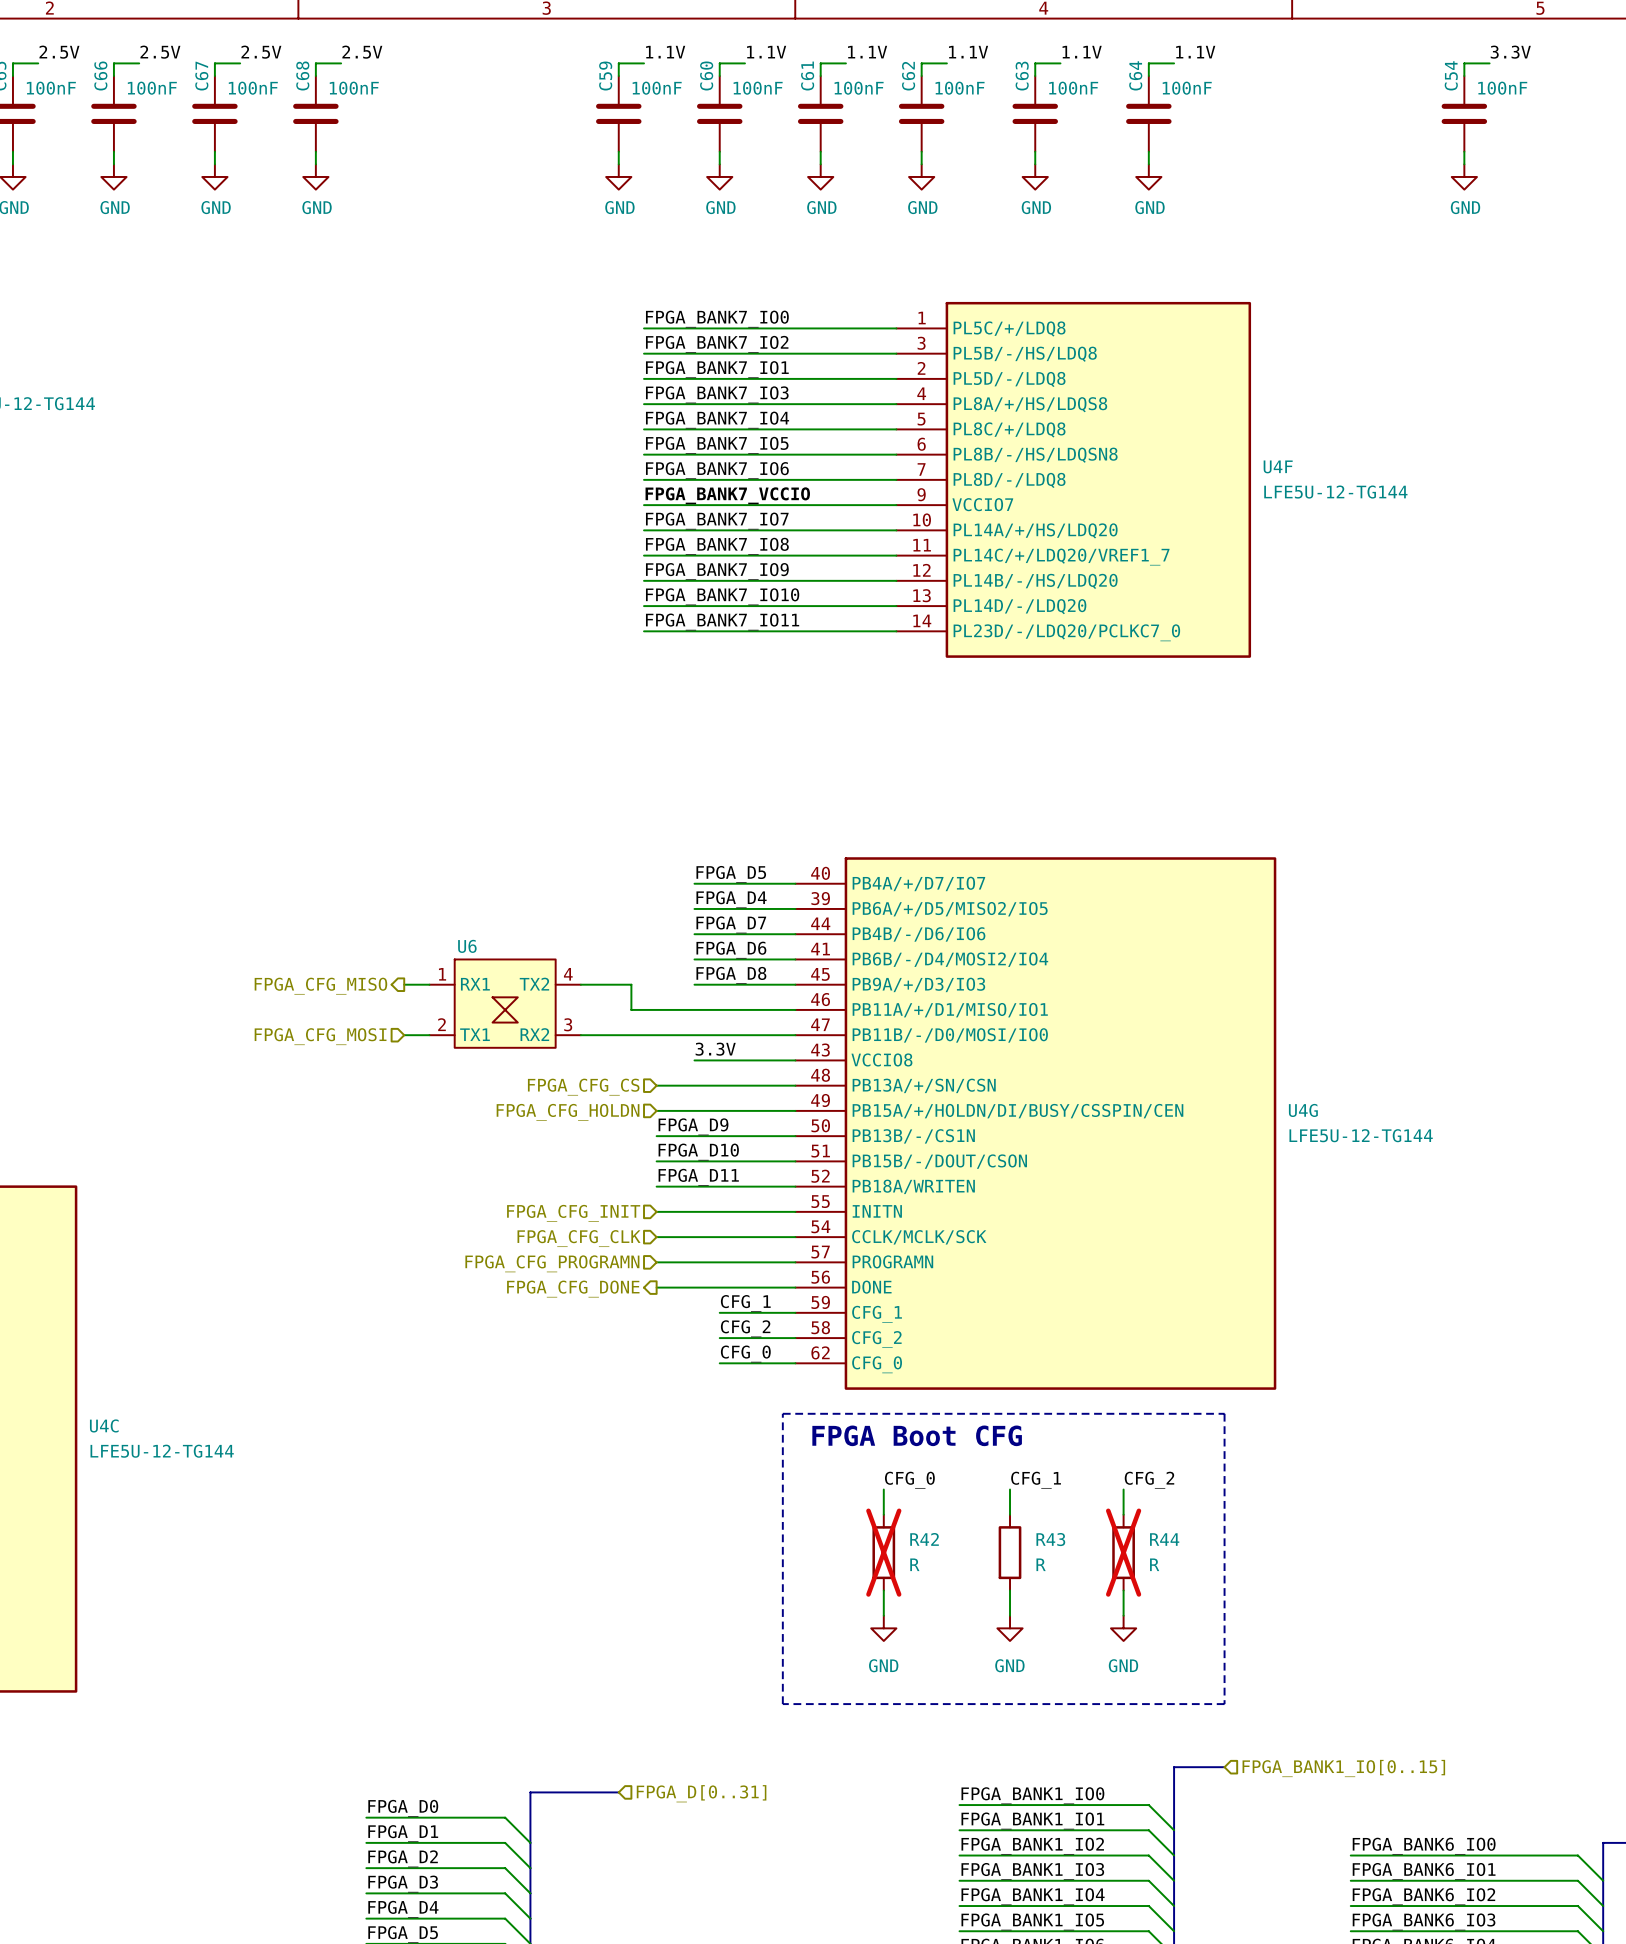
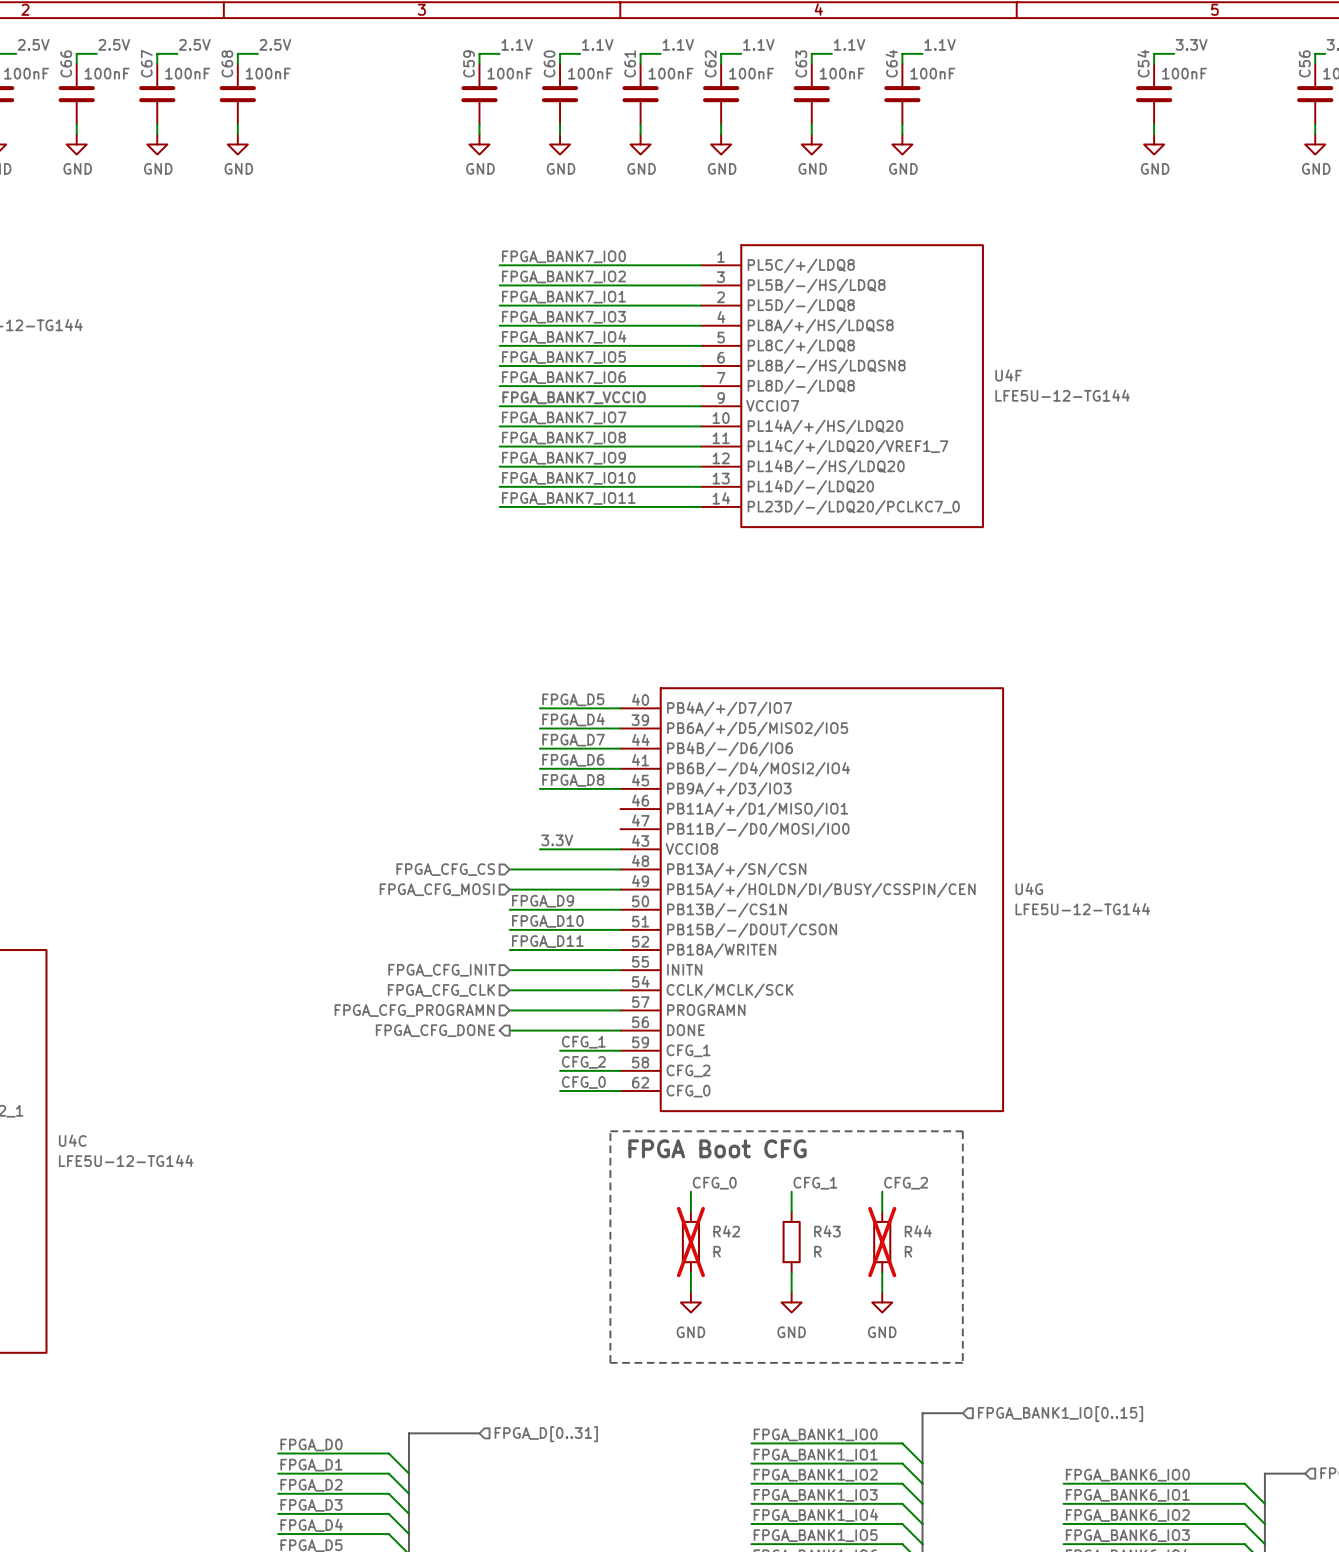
wire: (404, 984) (429, 984) -> none
wire: (580, 984) (631, 984) (631, 1009) (795, 1009) -> none
hierarchical label: FPGA_CFG_MISO (320, 986) -> none
U6: (505, 1003) -> none
wire: (404, 1035) (429, 1035) -> none
wire: (580, 1035) (795, 1035) -> none
hierarchical label: FPGA_CFG_MOSI (320, 1036) -> none
hierarchical label: FPGA_CFG_HOLDN (568, 1112) -> FPGA_CFG_MOSI (437, 889)

